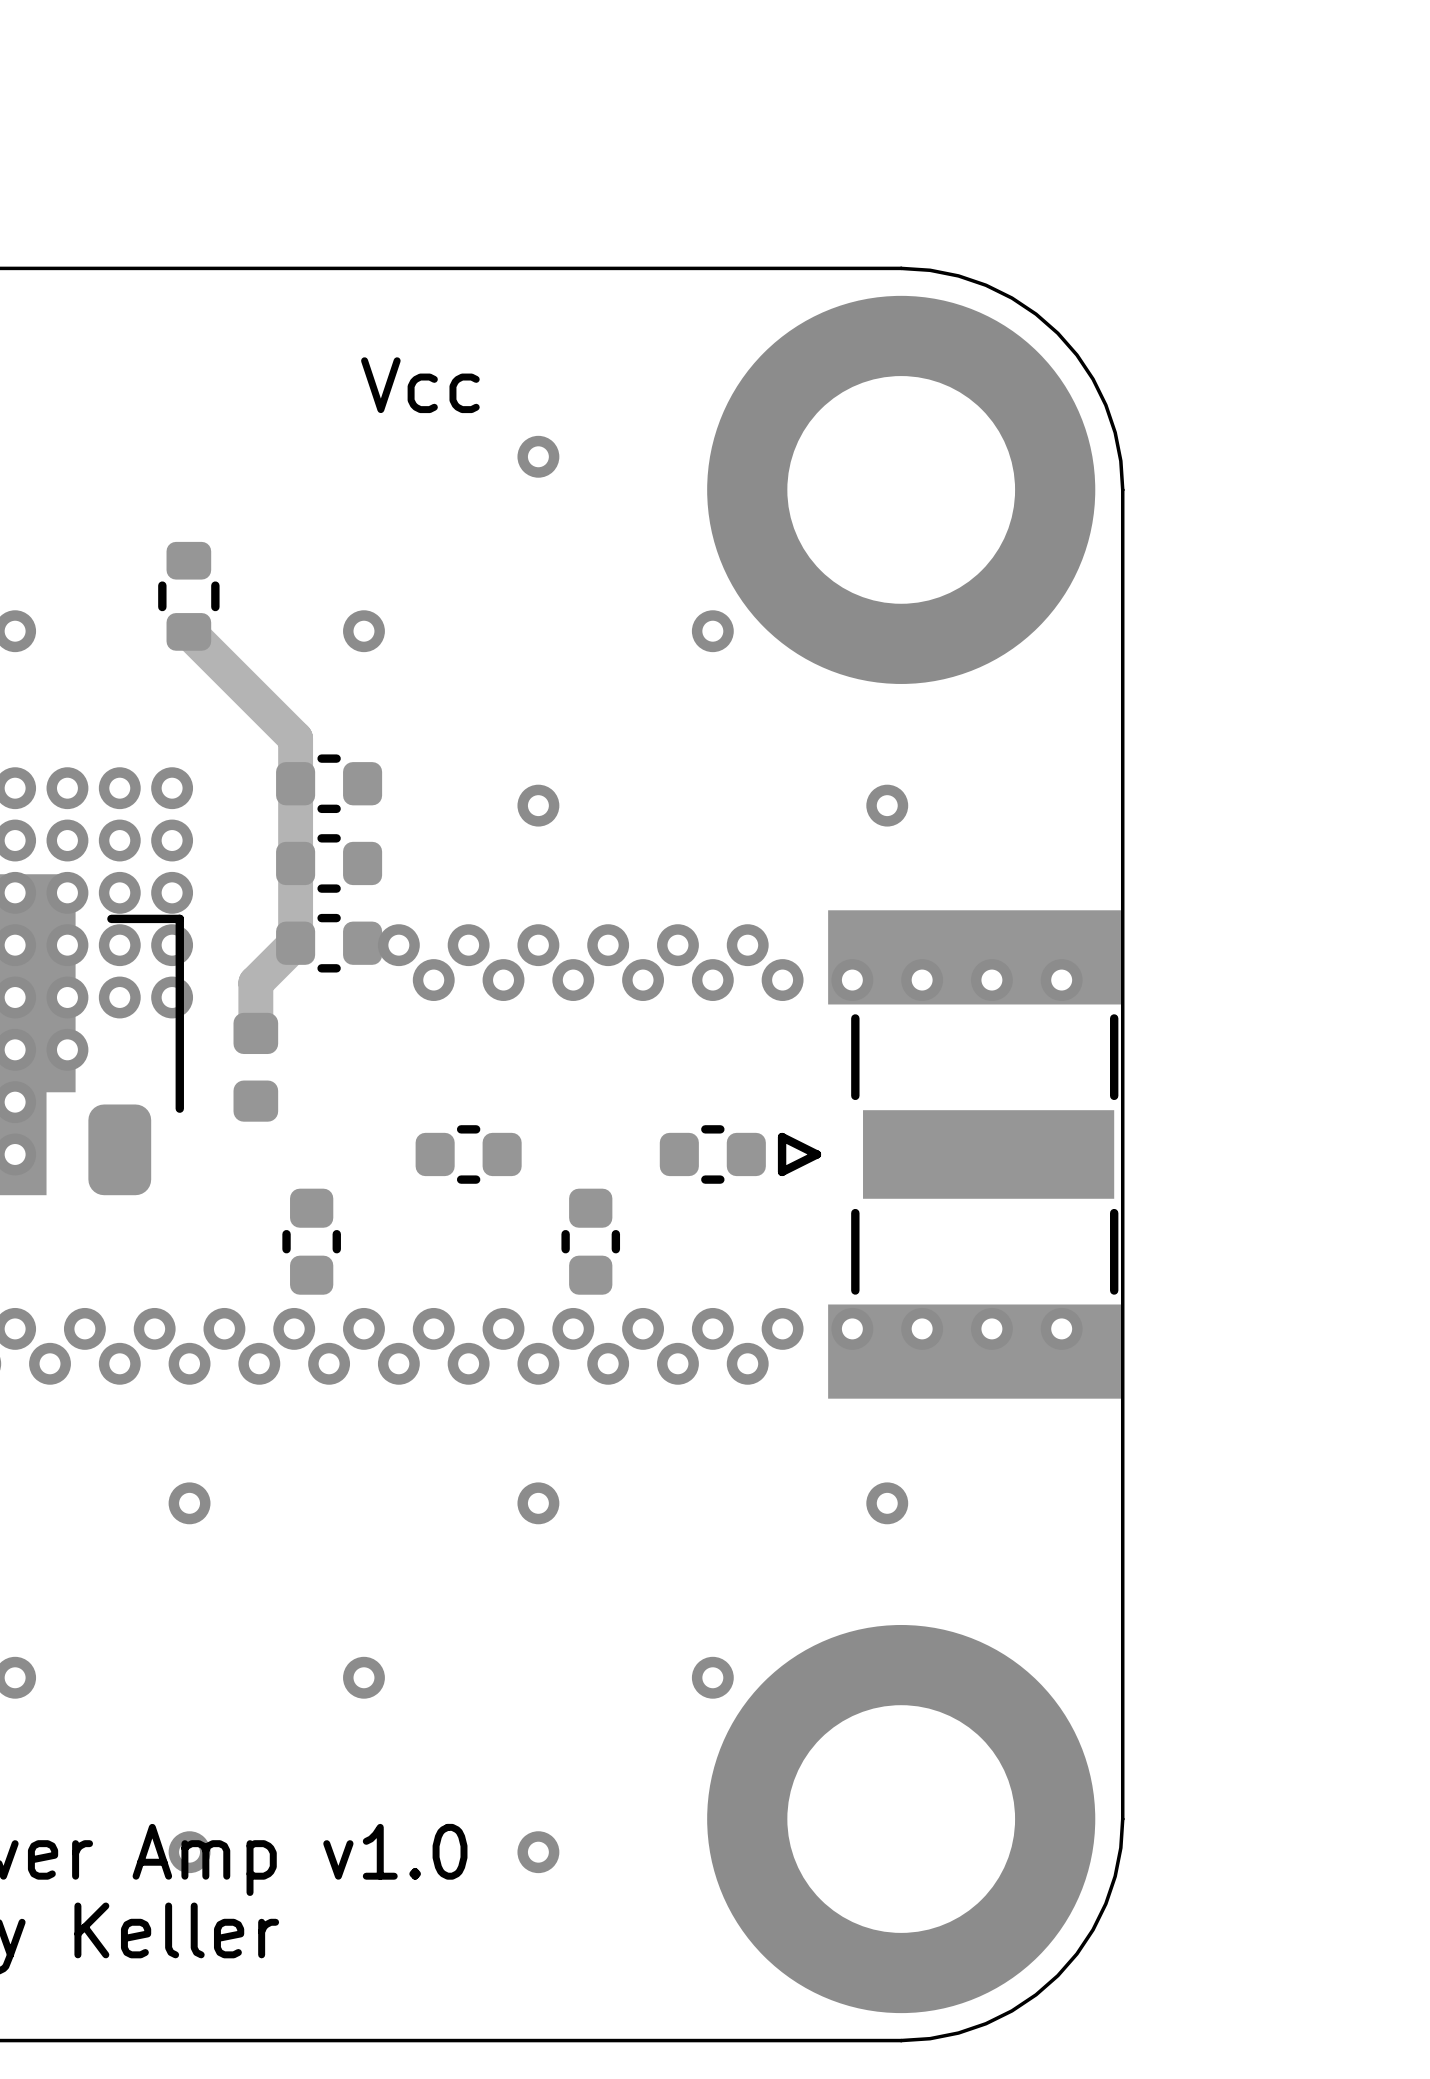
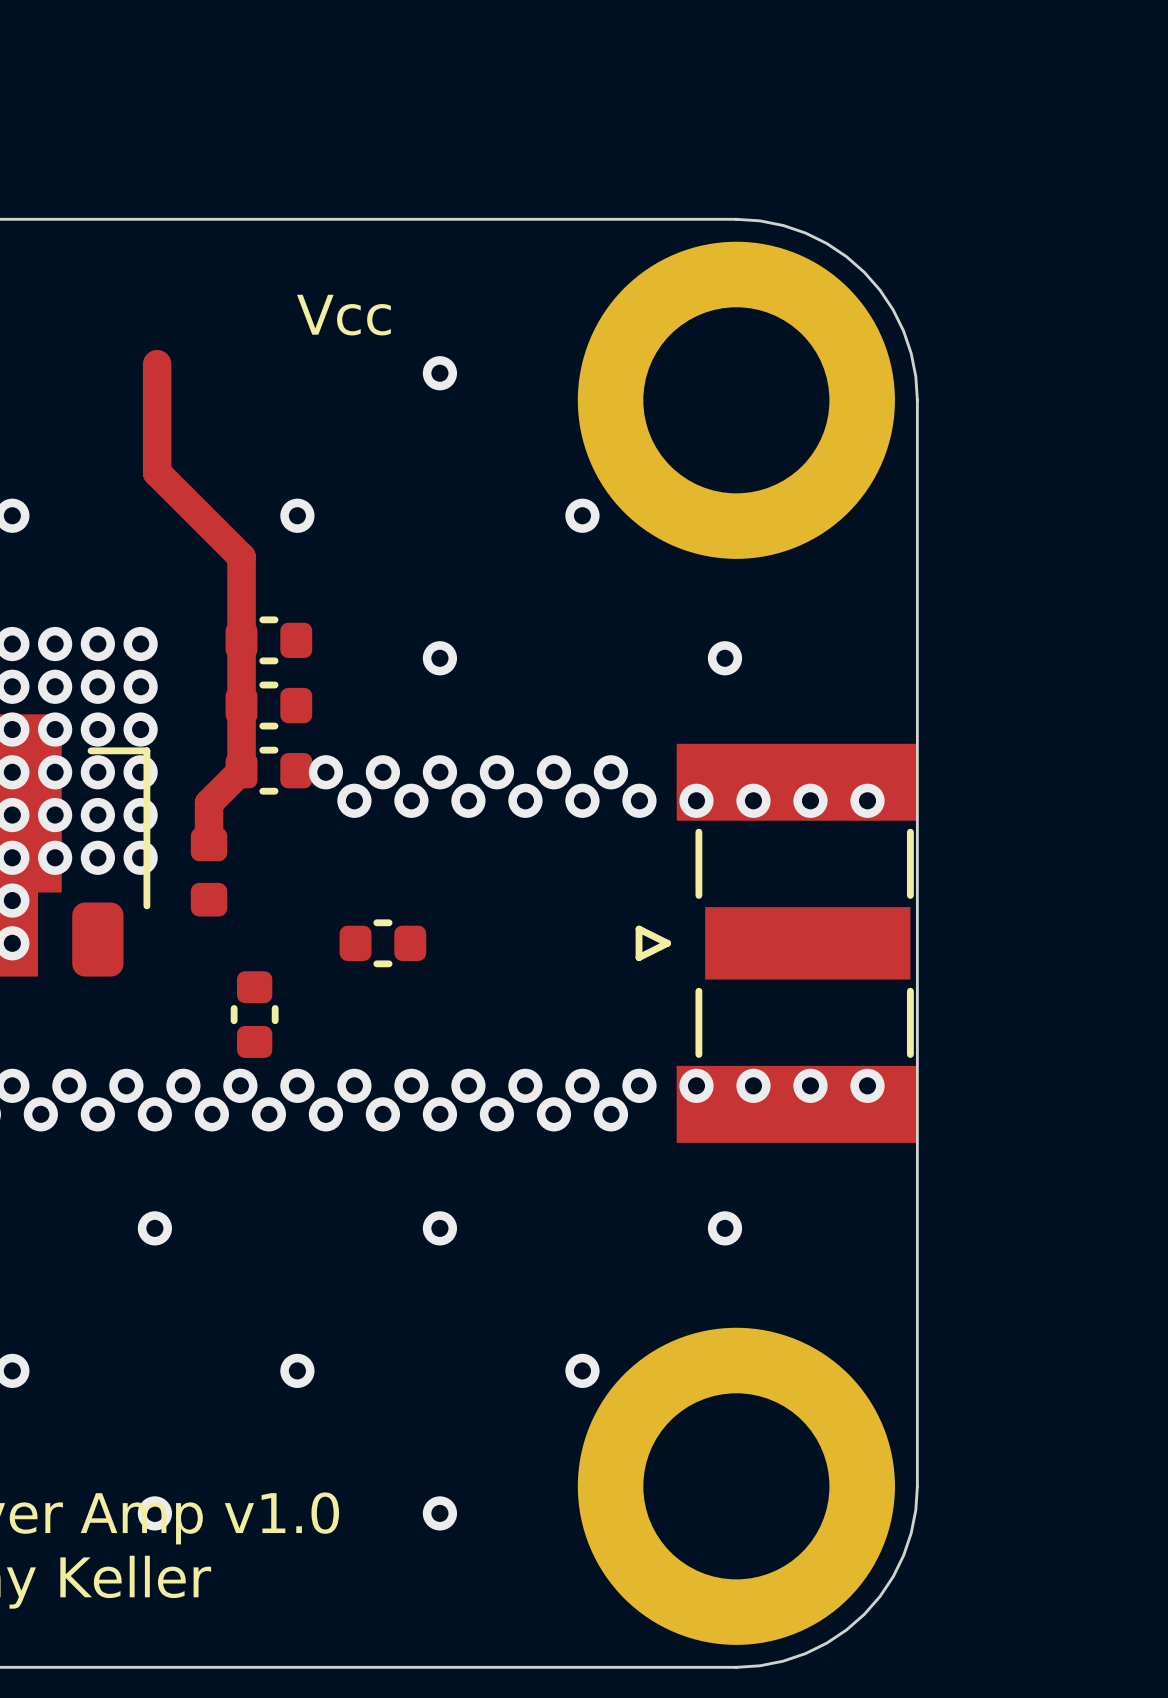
part: (188, 596) -> none
track: (188, 631) (295, 738) -> (157, 364) (157, 472) (241, 557) (241, 603)
via: none -> (97, 857)
via: none -> (140, 857)
part: (712, 1154) -> none
part: (590, 1241) -> none

